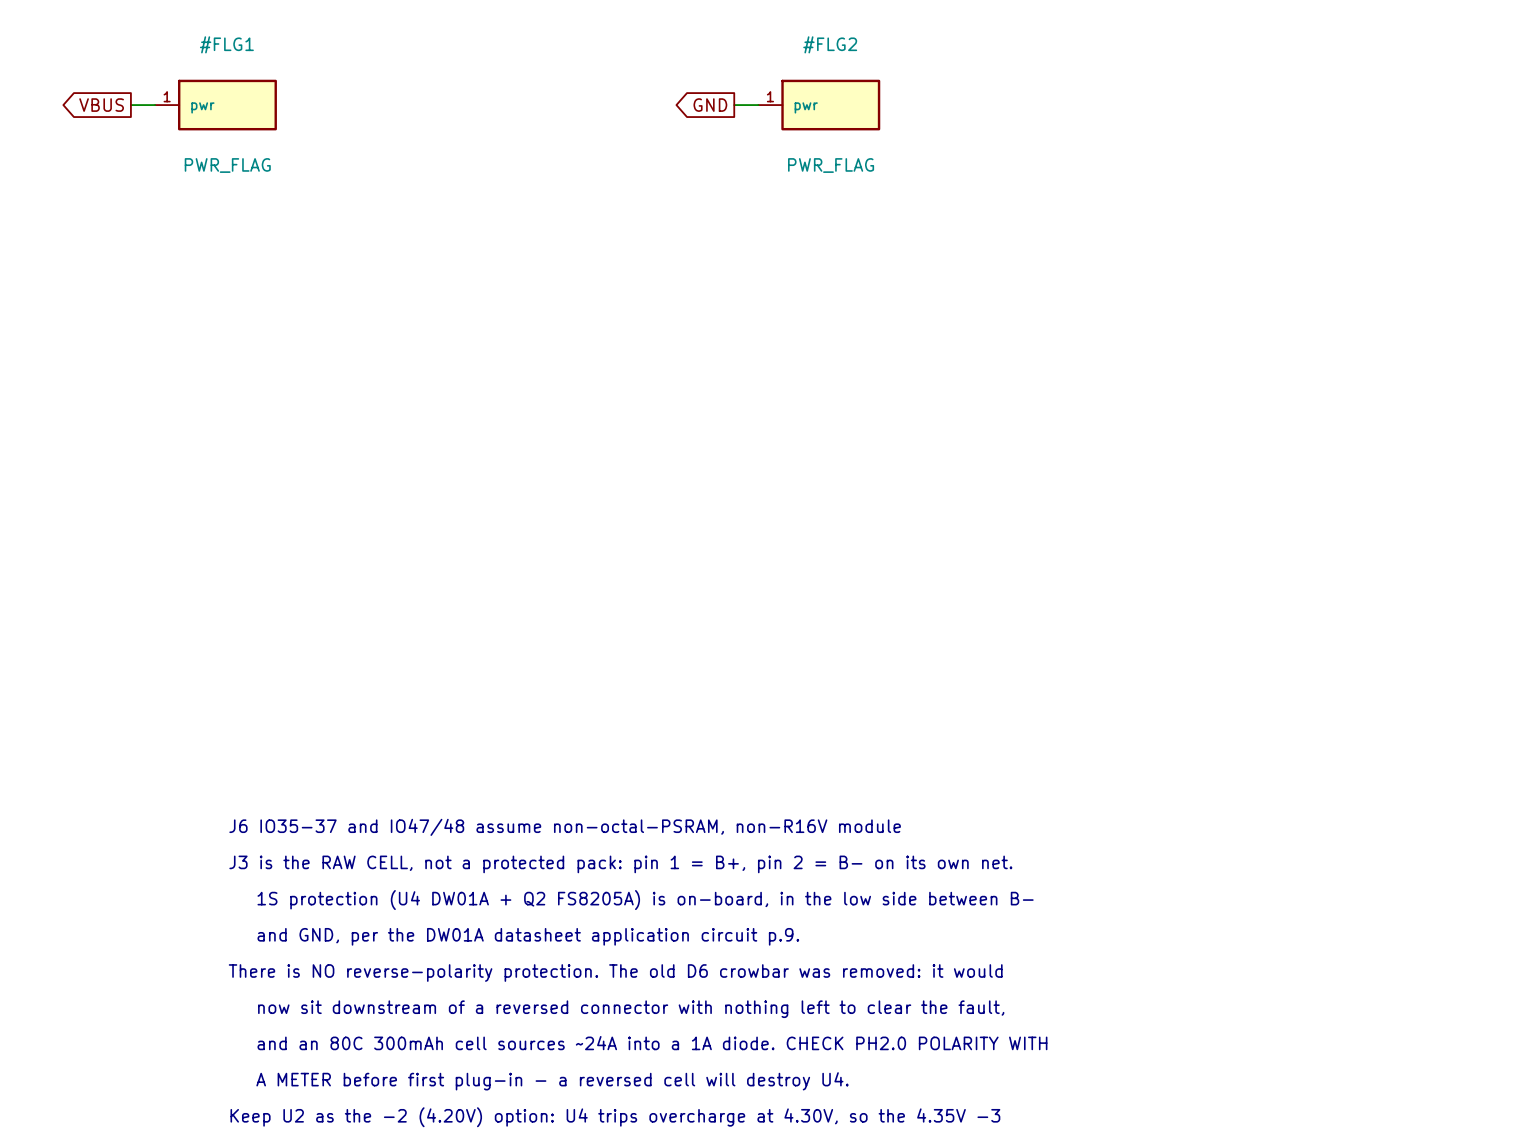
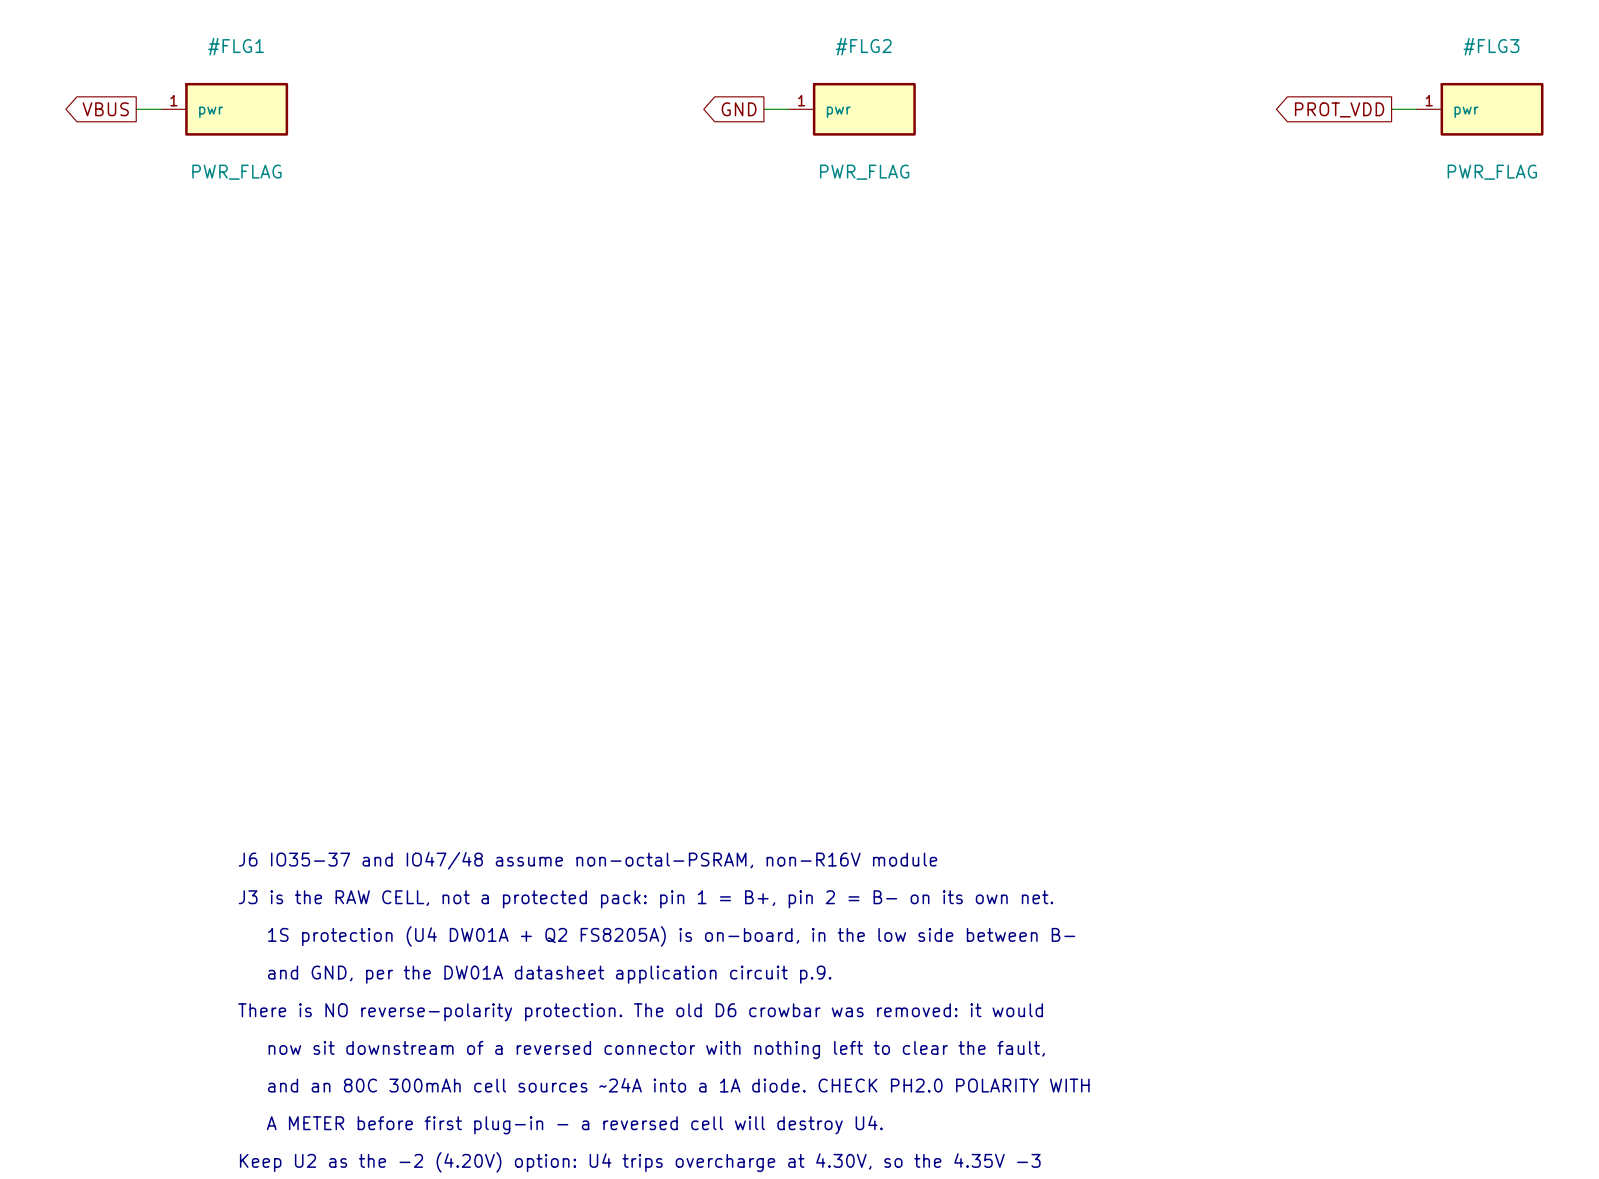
global label: none -> PROT_VDD (1339, 109)
wire: none -> (1391, 109) (1416, 109)
#FLG3: none -> PWR_FLAG (1480, 109)

